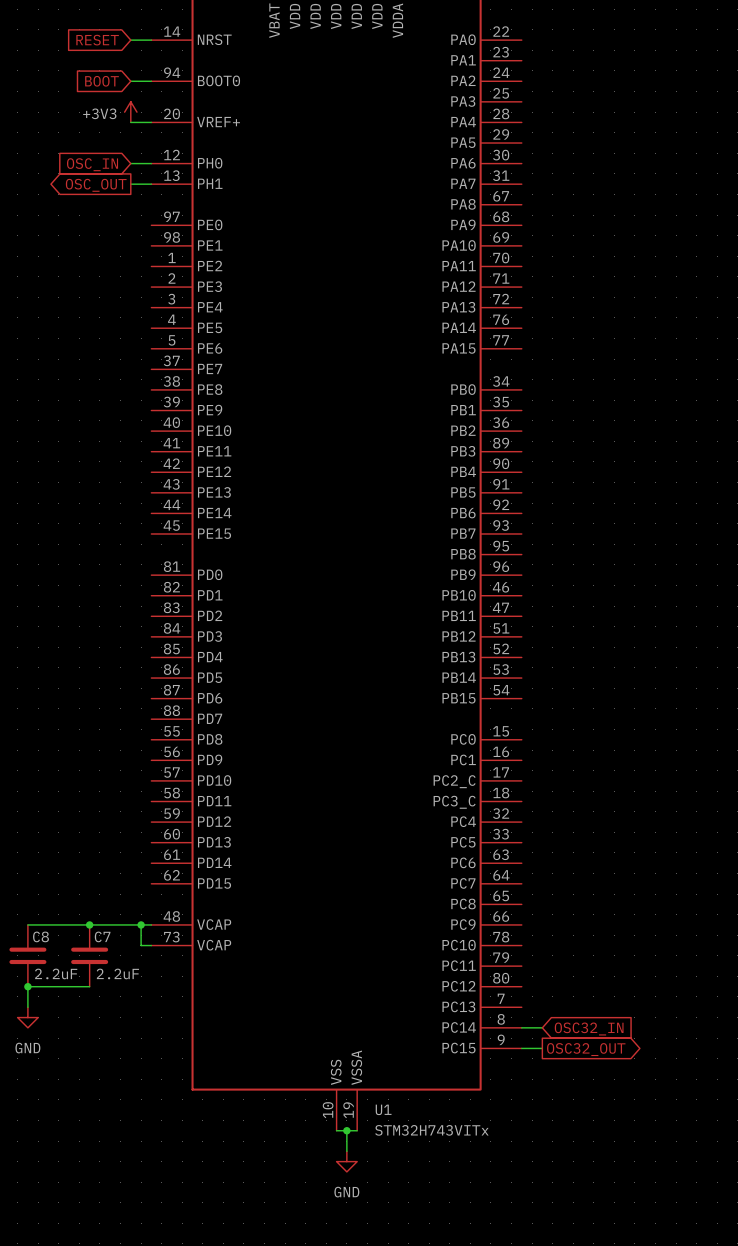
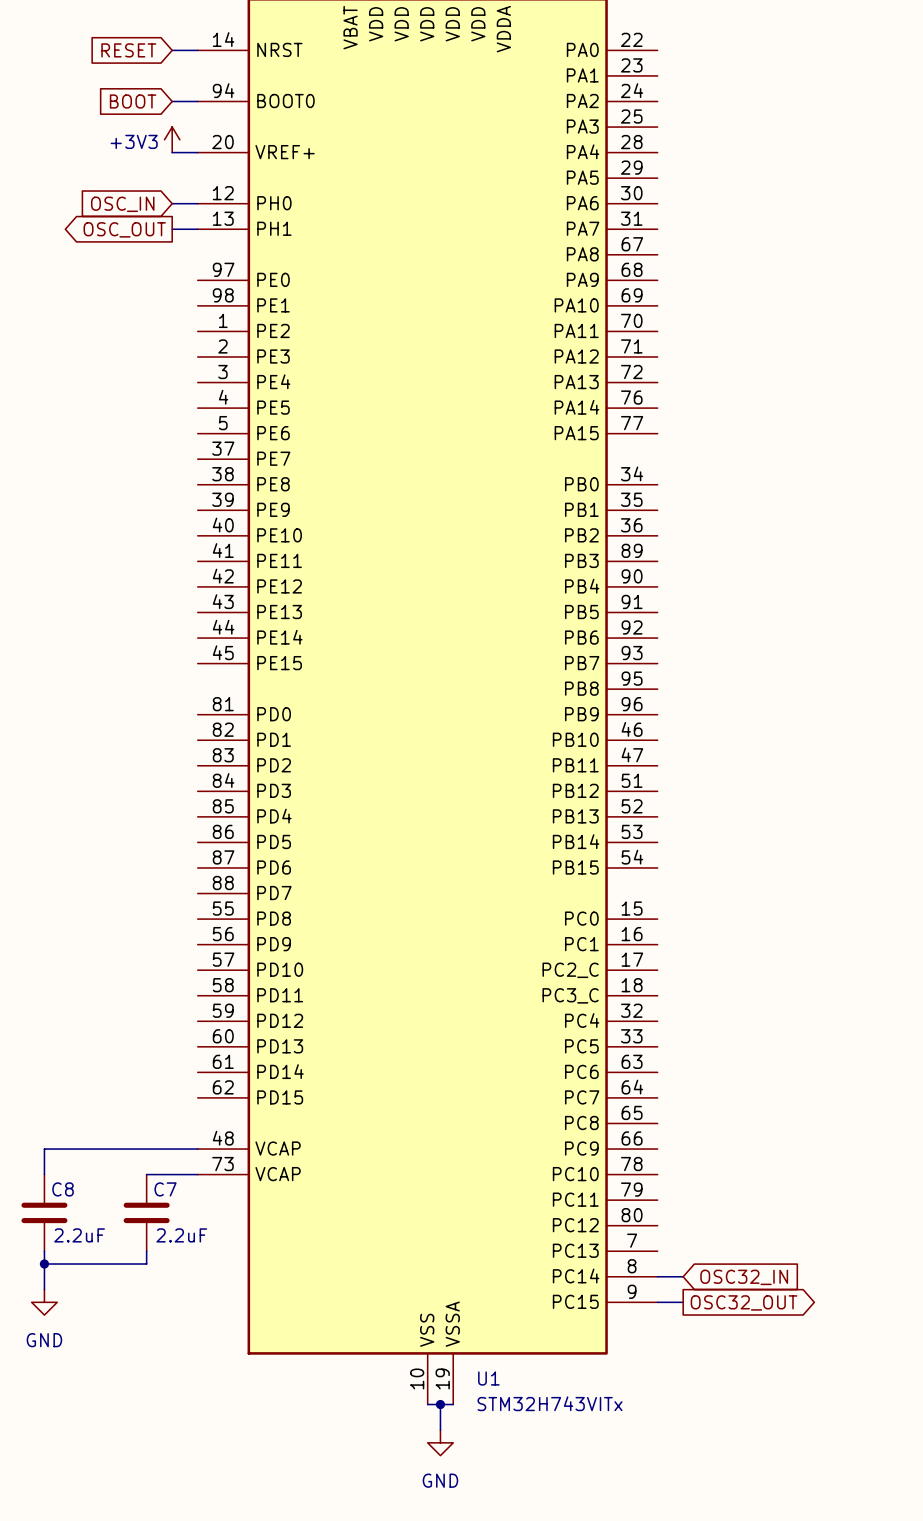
junction: (89, 924) -> none
wire: (141, 924) (141, 945) -> (146, 1174) (184, 1174)
junction: (141, 924) -> none
C8 position: (27, 955) -> (44, 1212)
C7 position: (89, 955) -> (146, 1212)
junction position: (27, 986) -> (44, 1264)
wire: (89, 986) (27, 986) (27, 1007) -> (44, 1289) (44, 1251)
wire: none -> (146, 1251) (146, 1264) (44, 1264)
power symbol position: GND (27, 1017) -> GND (44, 1302)

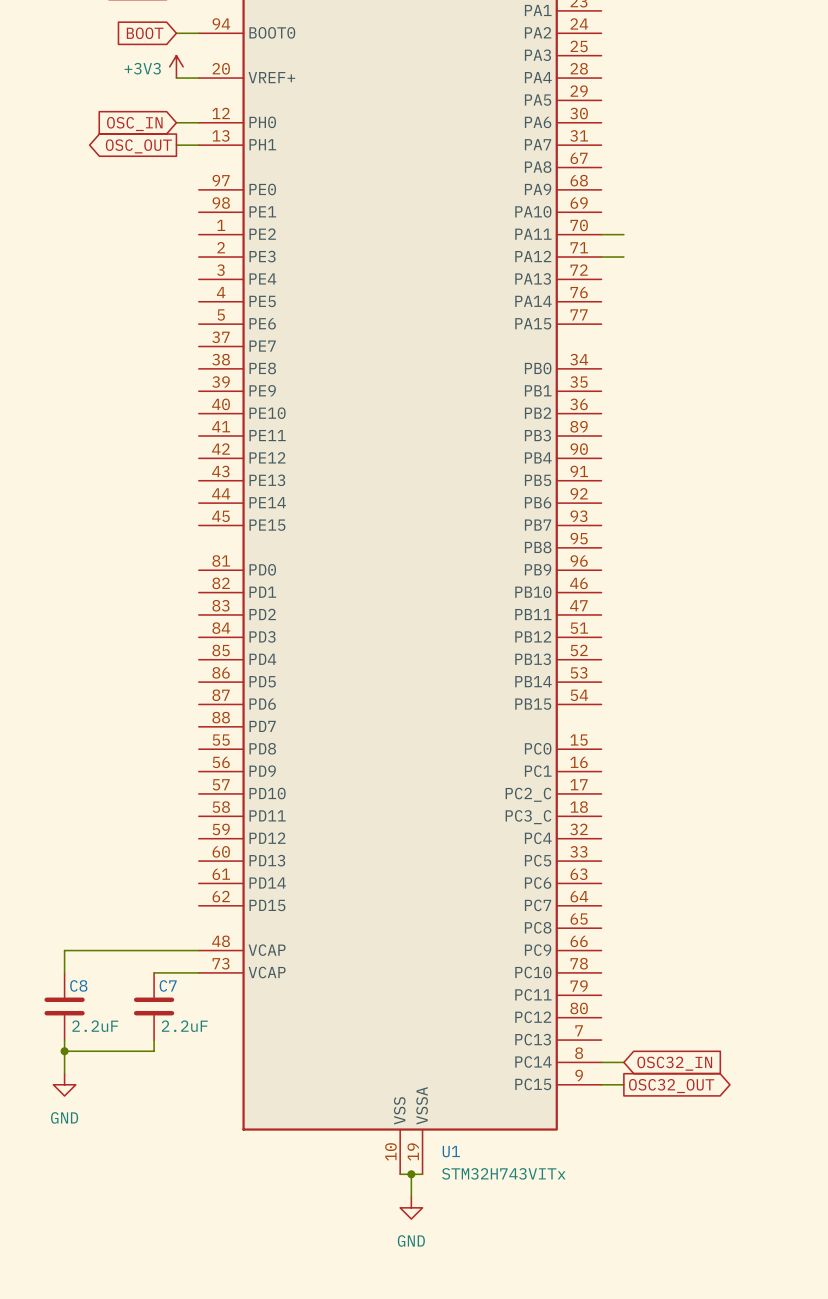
wire: none -> (601, 234) (623, 234)
wire: none -> (601, 257) (623, 257)

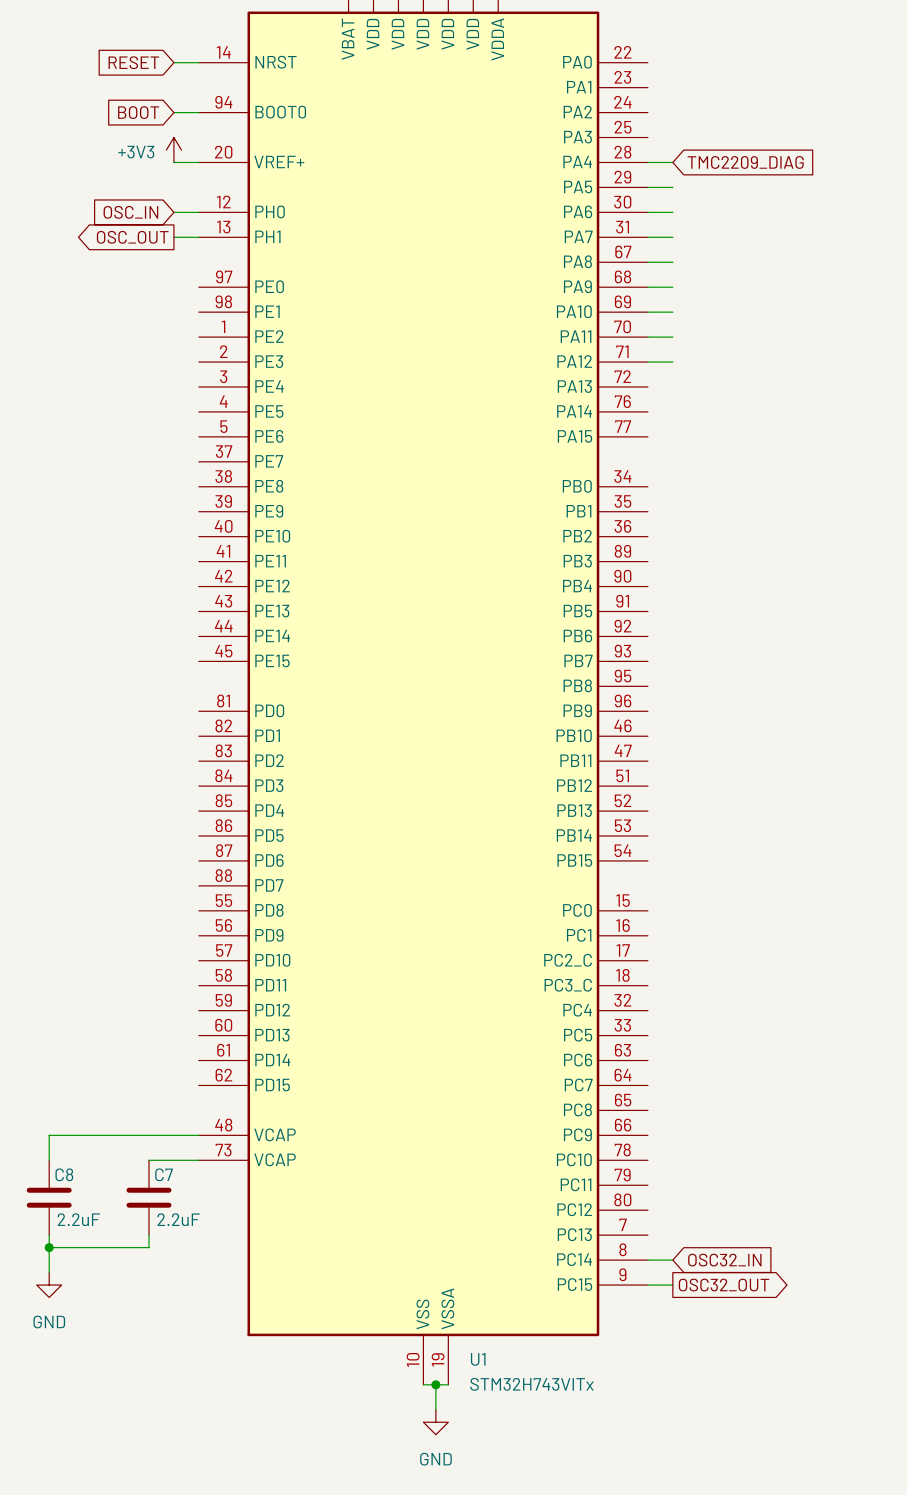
wire: none -> (647, 162) (672, 162)
global label: none -> TMC2209_DIAG (745, 162)
wire: none -> (647, 187) (672, 187)
wire: none -> (647, 212) (672, 212)
wire: none -> (647, 237) (672, 237)
wire: none -> (647, 262) (672, 262)
wire: none -> (647, 287) (672, 287)
wire: none -> (647, 312) (672, 312)

